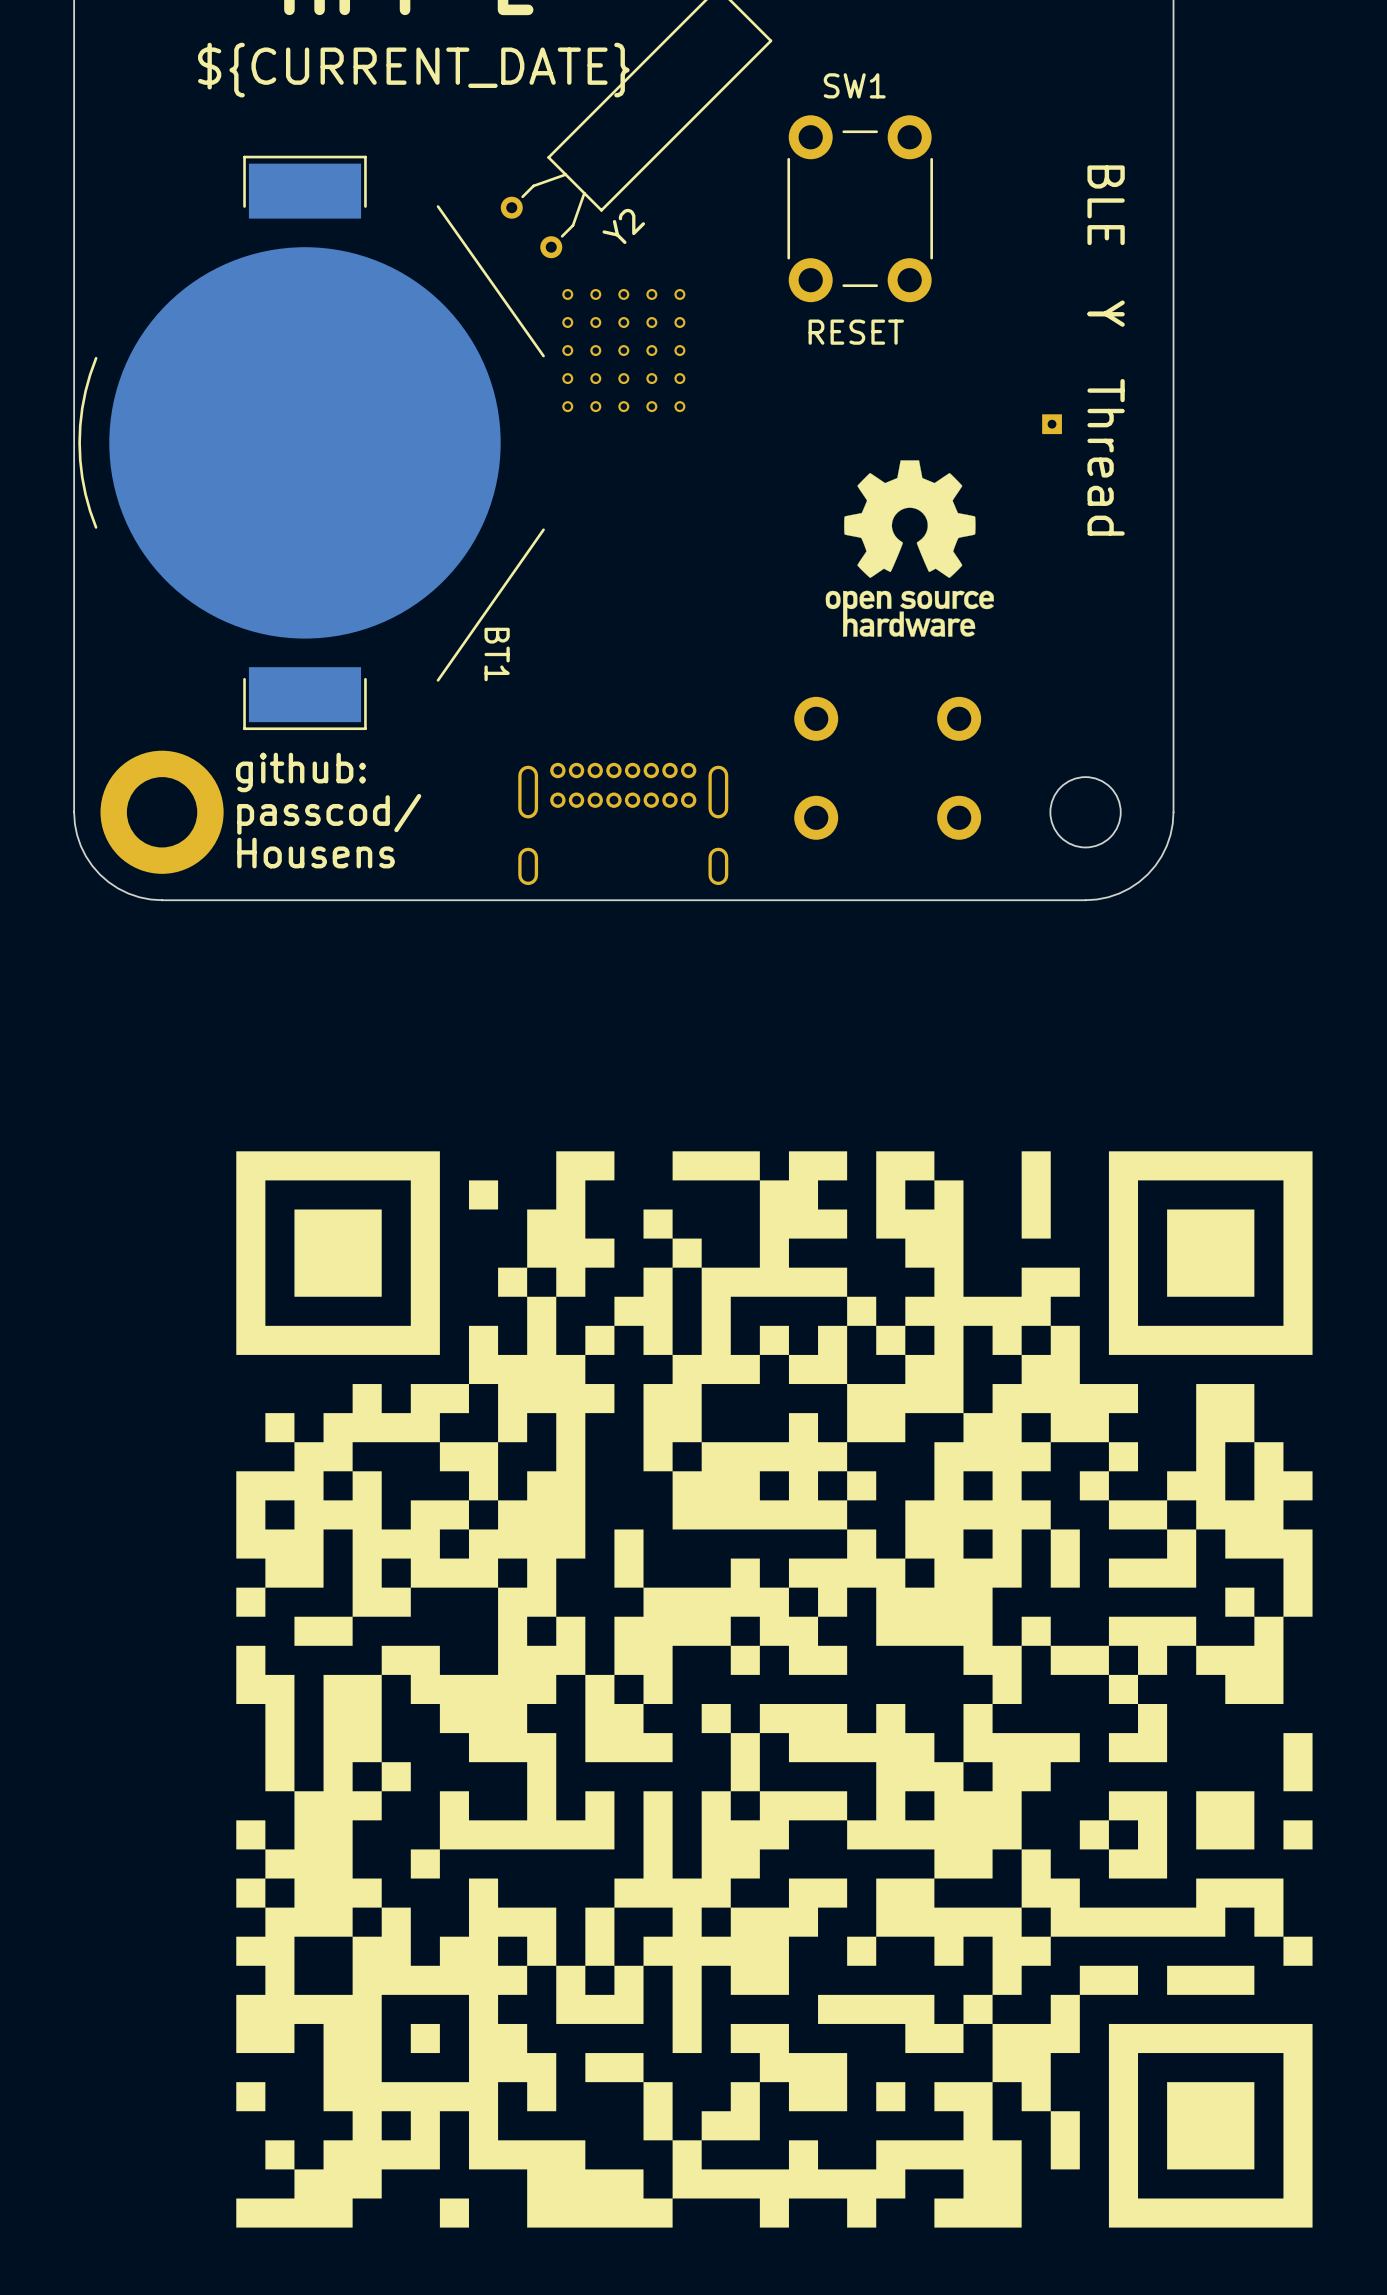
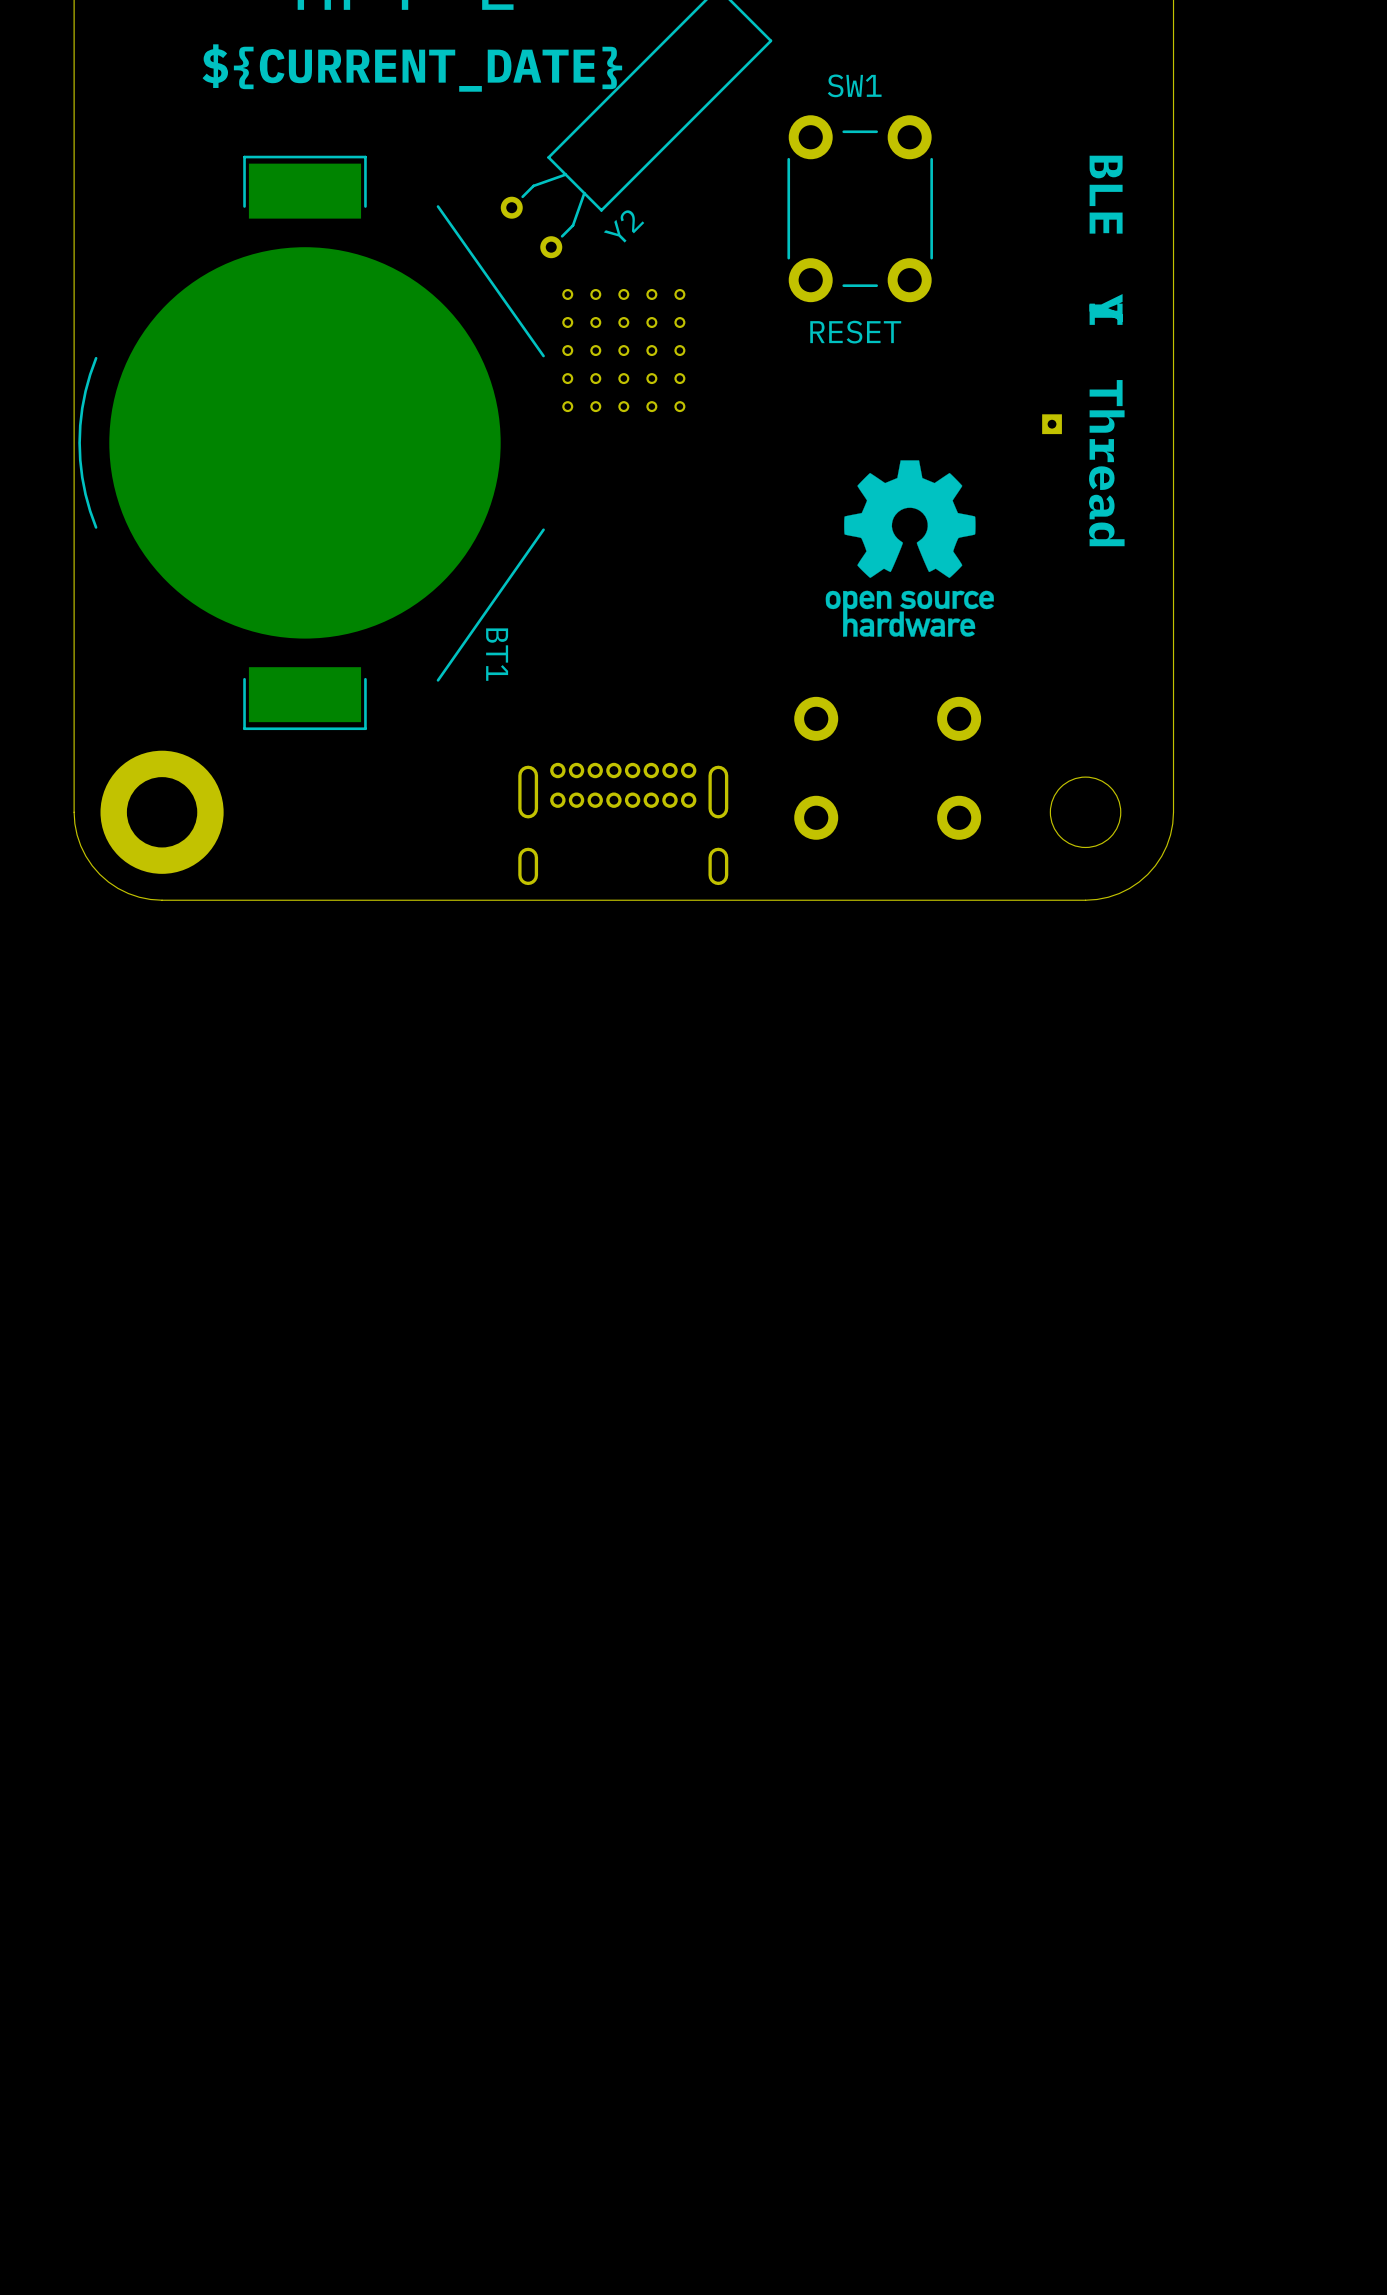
text: github: (300, 772) -> none
text: passcod/ (329, 814) -> none
text: Housens (316, 853) -> none
drawing: [236, 1151, 1313, 2228] -> none
drawing: [468, 1180, 499, 1210] -> none
drawing: [1283, 1733, 1313, 1792] -> none
drawing: [1167, 1965, 1255, 1995] -> none
drawing: [1108, 2023, 1313, 2228] -> none

